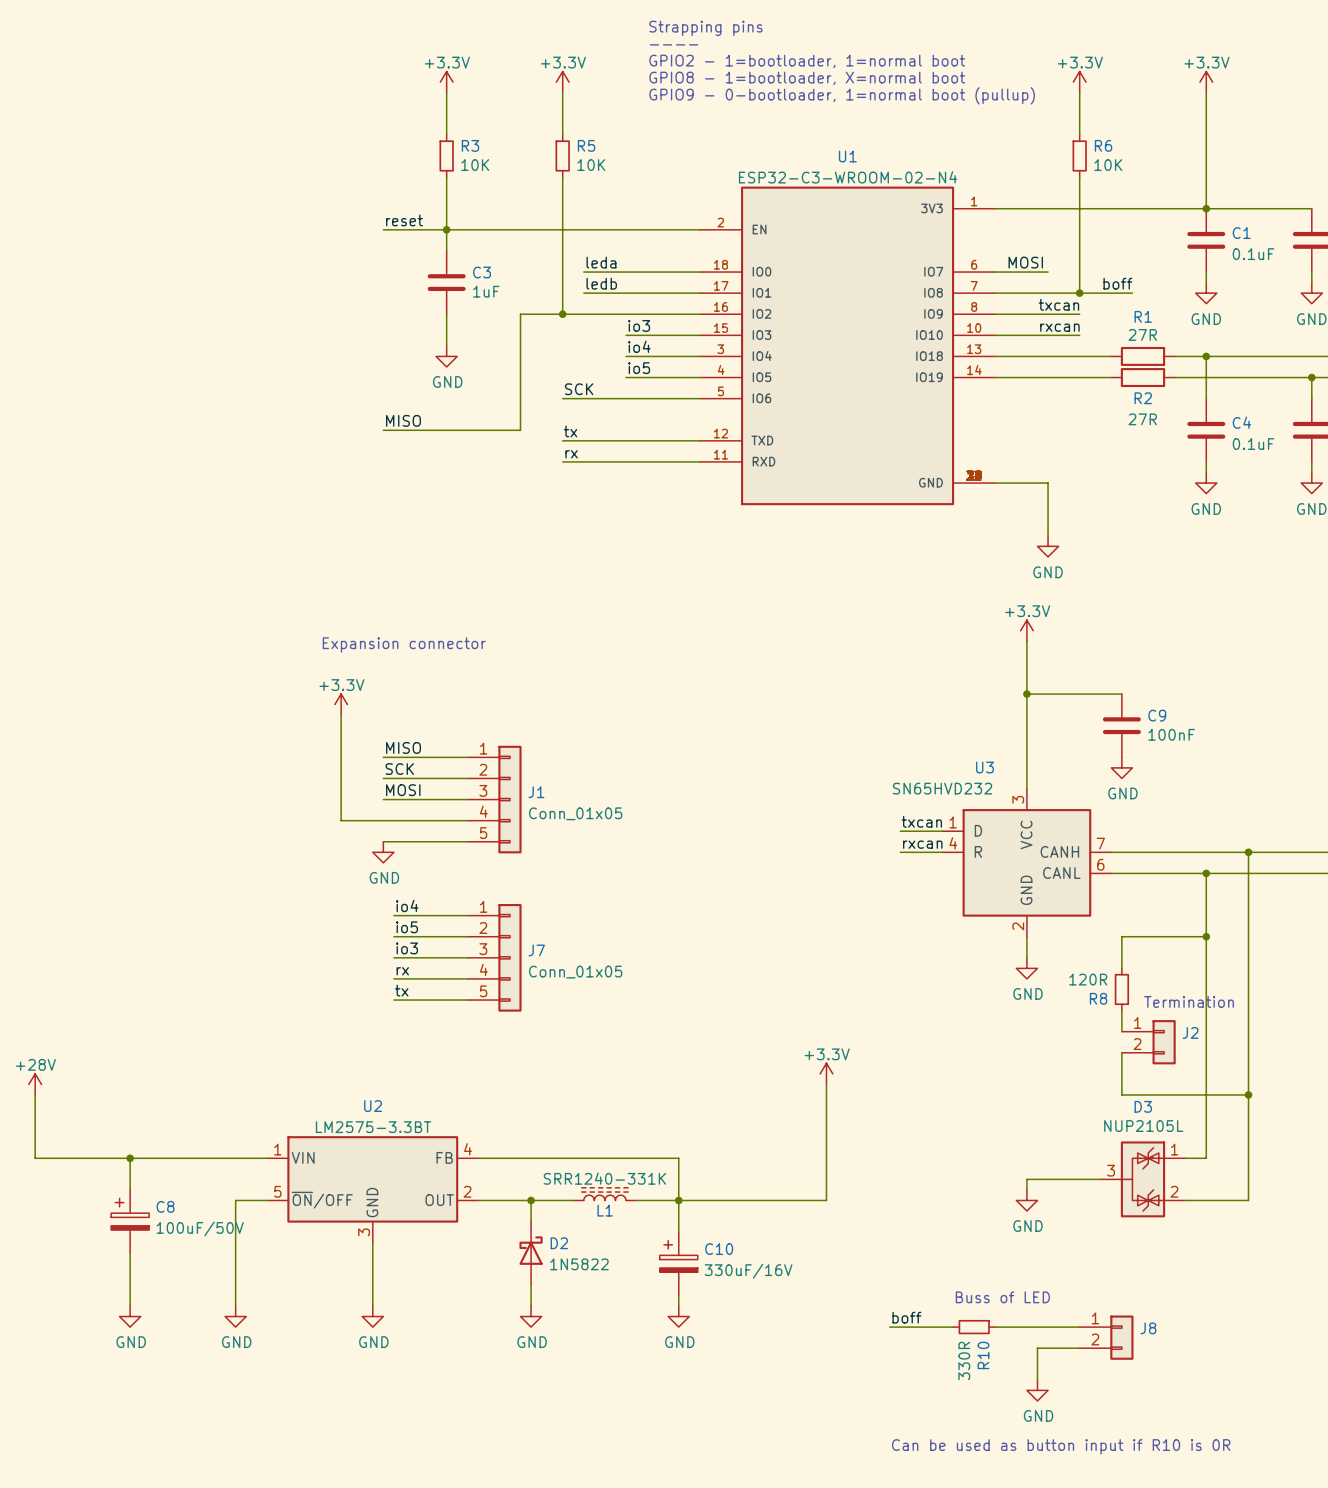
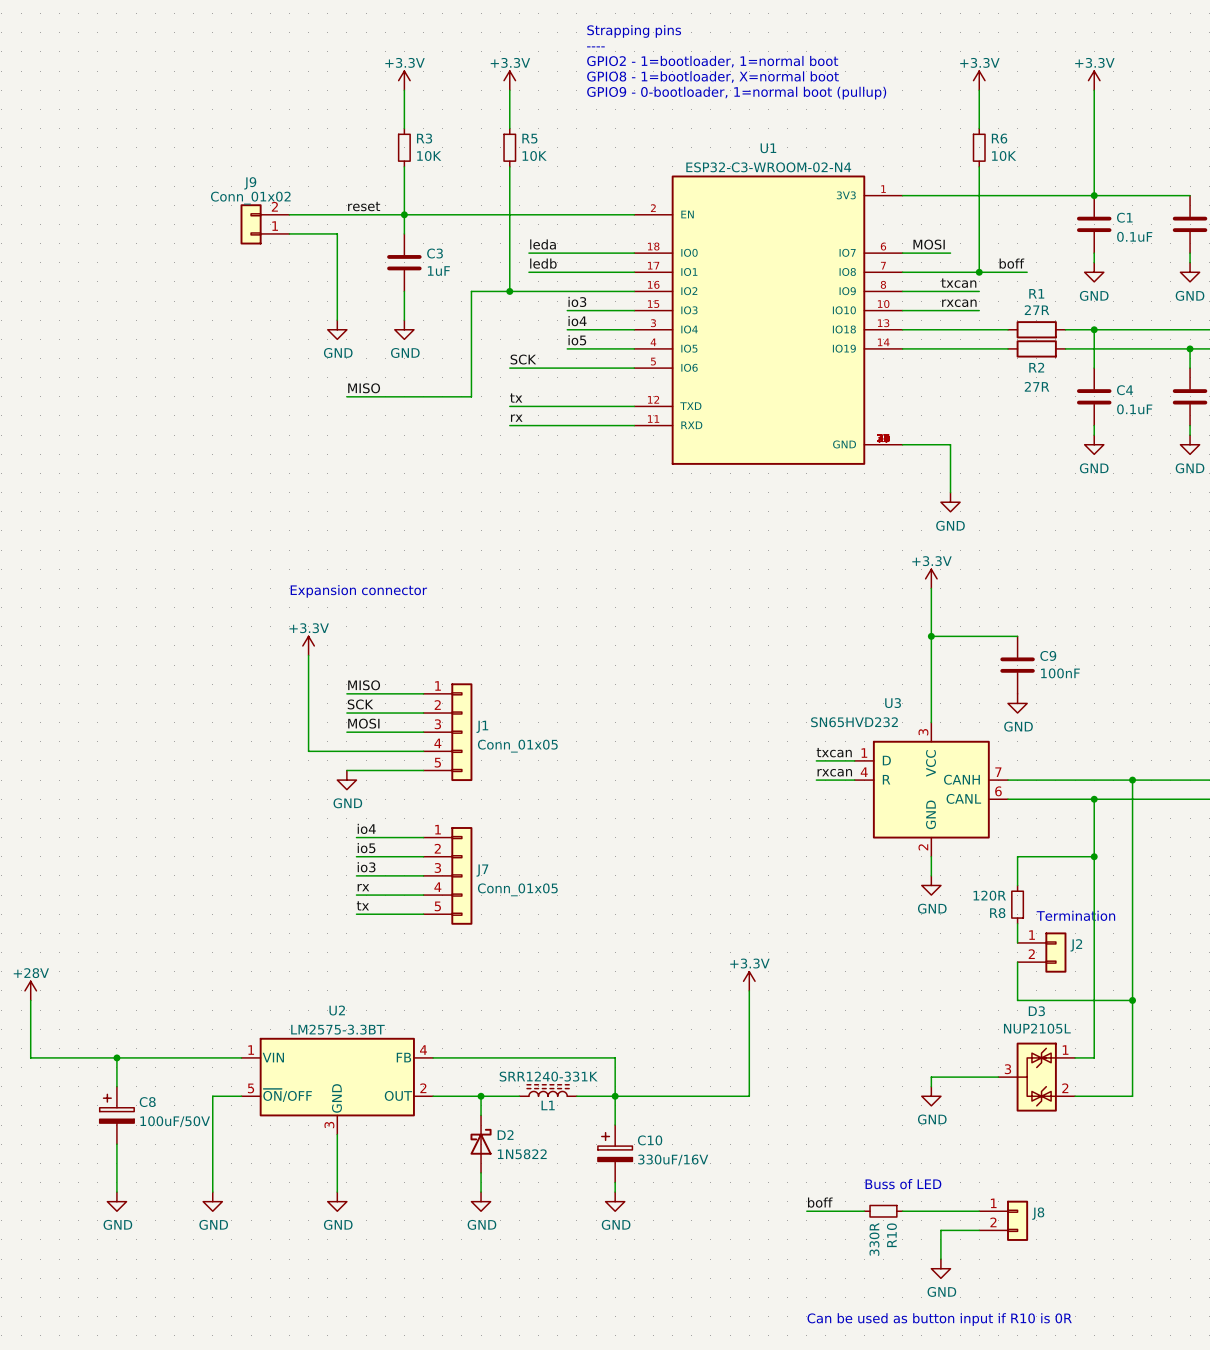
wire: none -> (289, 214) (346, 214)
J9: none -> Conn_01x02 (264, 224)
wire: none -> (289, 233) (337, 233) (337, 320)
power symbol: none -> GND (337, 329)

